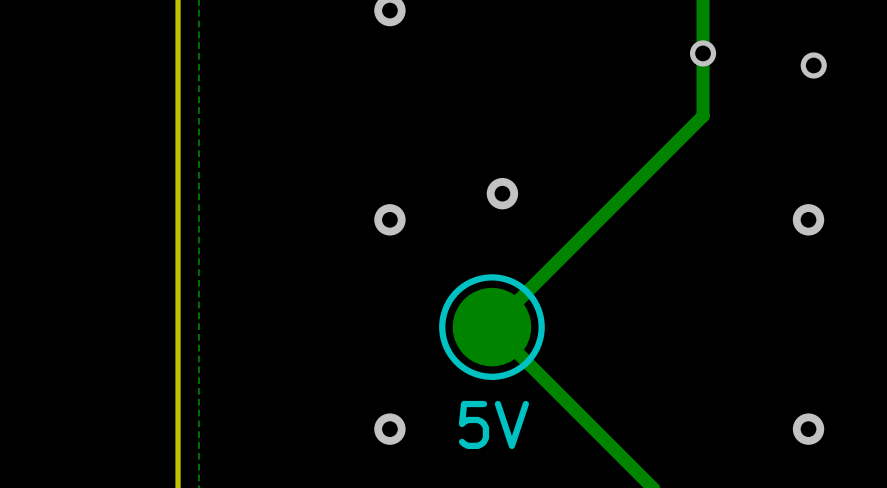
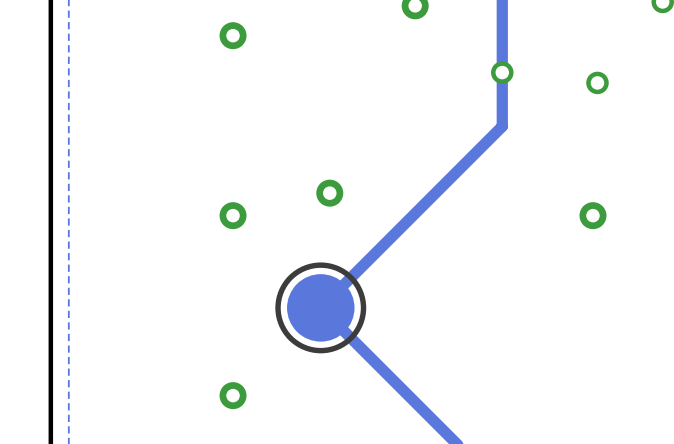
text: 5V (493, 424) -> none
via: (808, 429) -> none

